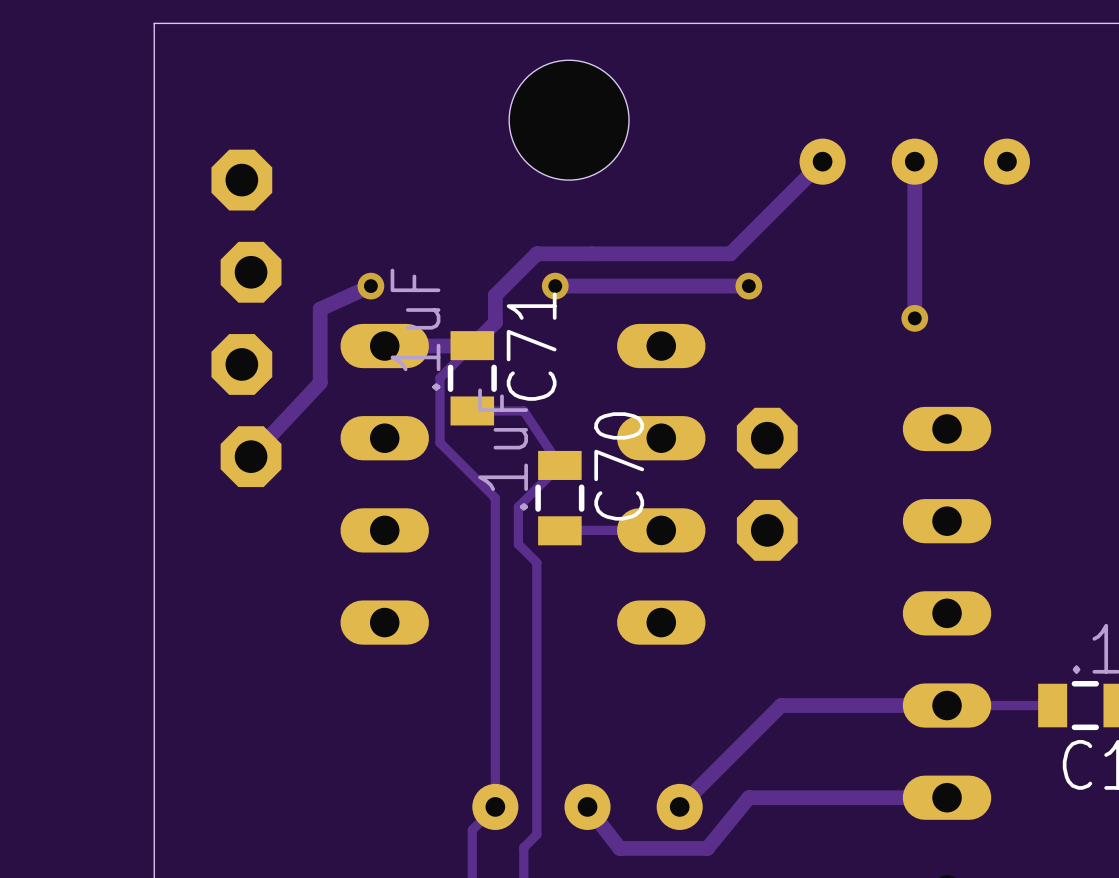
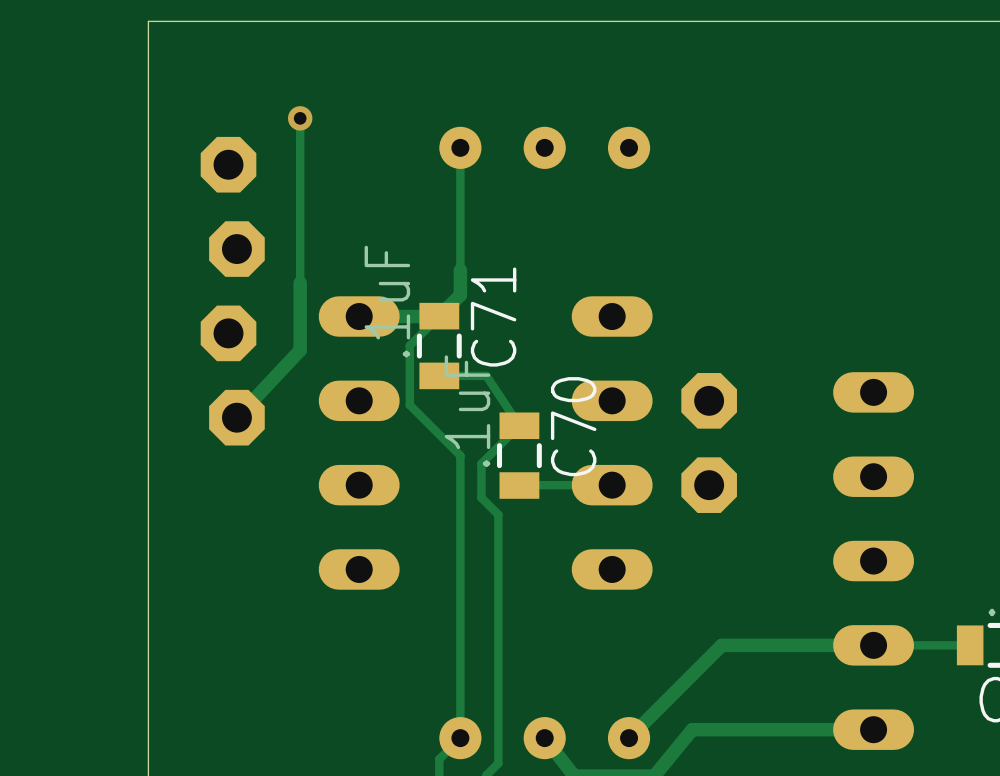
part: (569, 120) -> none
via: none -> (300, 118)
track: (822, 161) (730, 253) (536, 253) (495, 295) -> (460, 147) (460, 270)
track: (914, 161) (914, 318) -> none
part position: (914, 161) -> (544, 147)
track: (370, 286) (320, 309) -> (300, 118) (300, 282)
via: (370, 286) -> none
via: (555, 286) -> none
track: (748, 286) (555, 286) -> none
via: (748, 286) -> none
via: (914, 318) -> none

